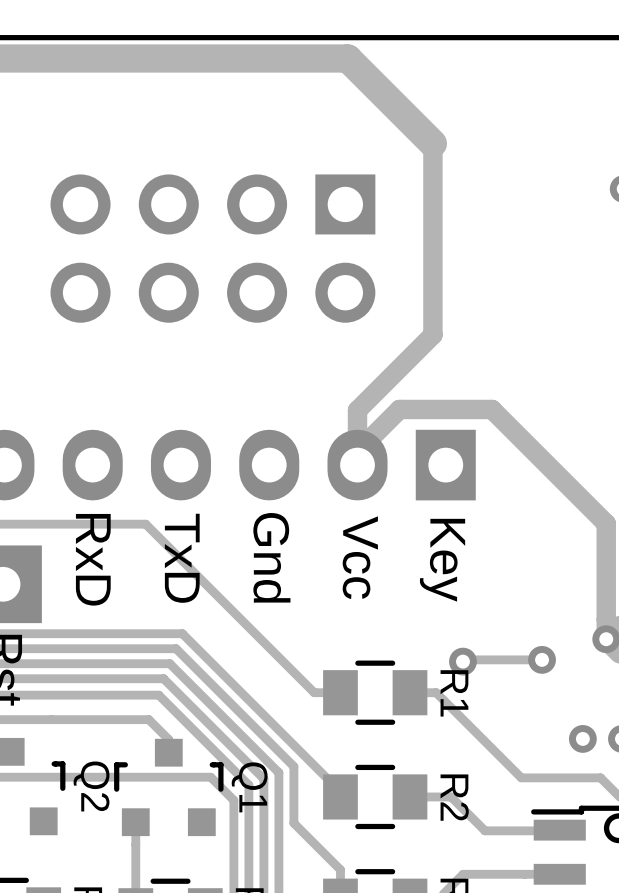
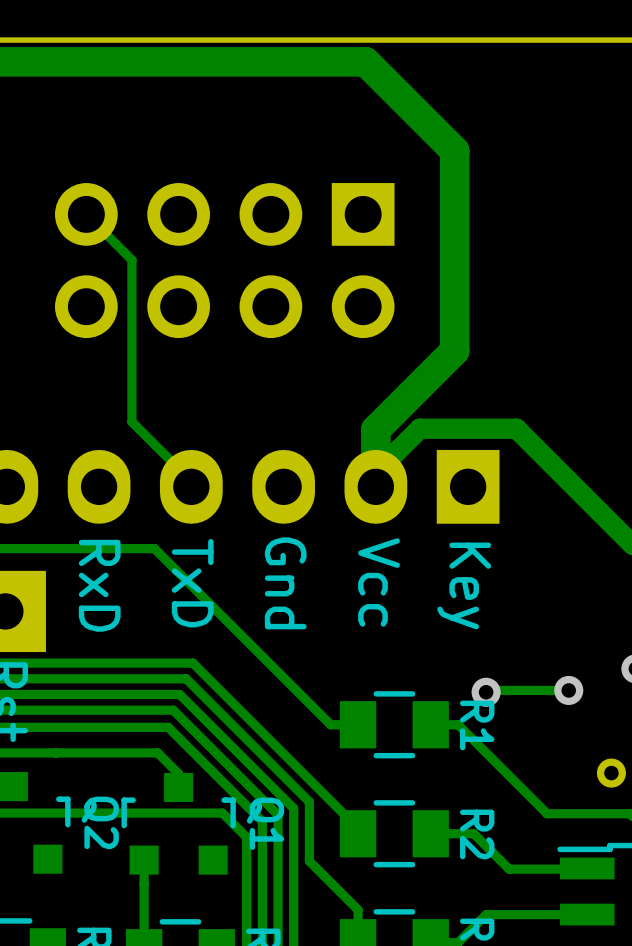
track width: thin (432, 143) (432, 334) (357, 410) (357, 451) -> thick (454, 150) (454, 350) (375, 429) (375, 472)
track: none -> (86, 214) (131, 260) (131, 421) (191, 481) (191, 486)

